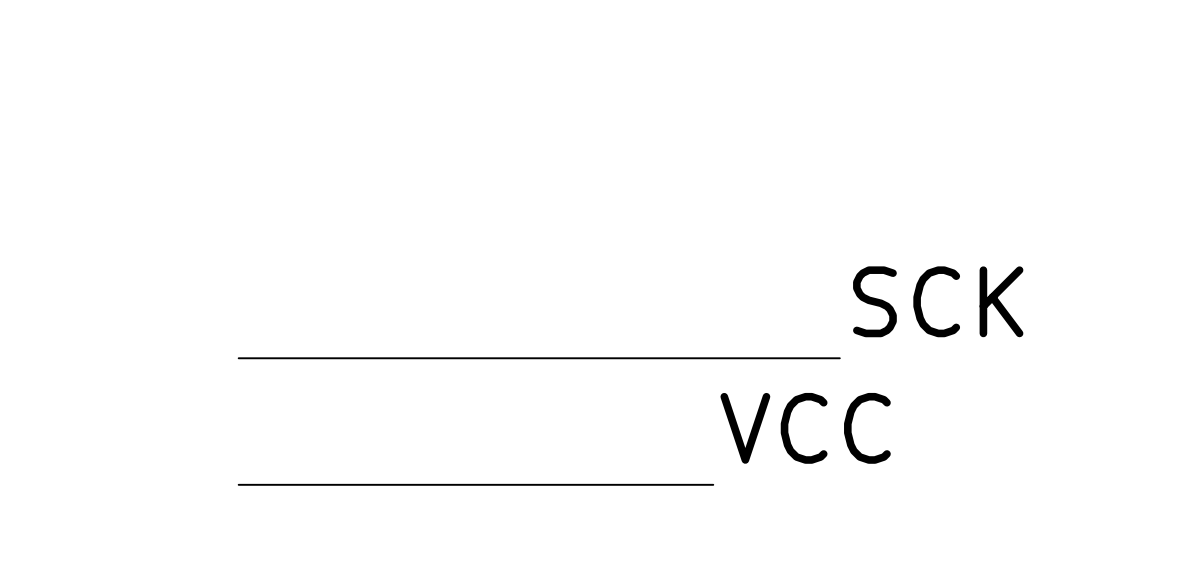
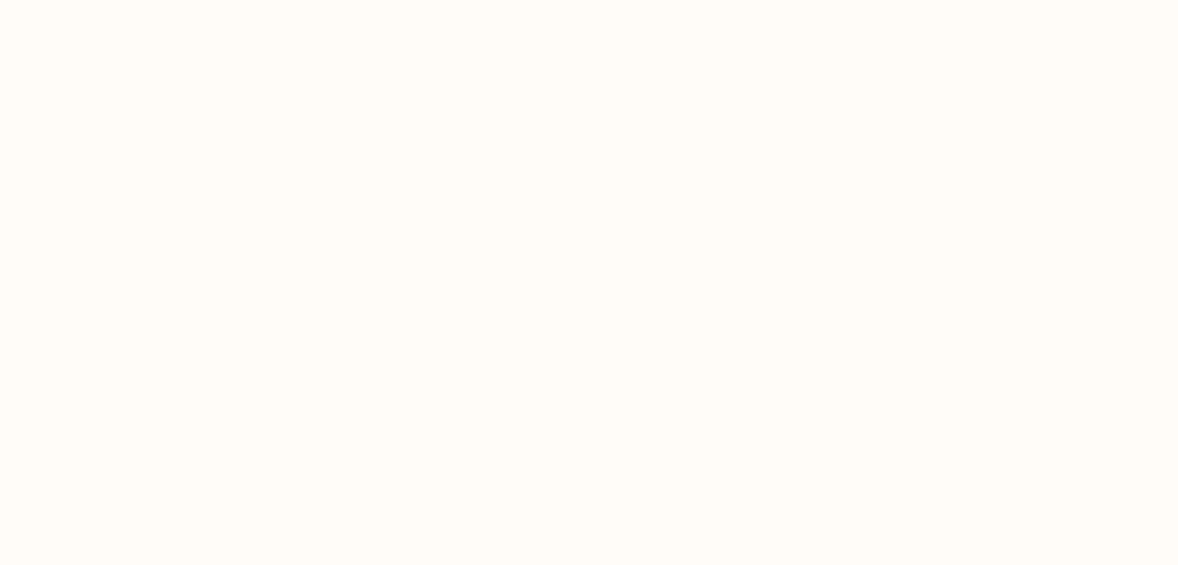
label: SCK (938, 301) -> none
wire: (238, 358) (839, 358) -> none
label: VCC (805, 428) -> none
wire: (238, 484) (713, 484) -> none

